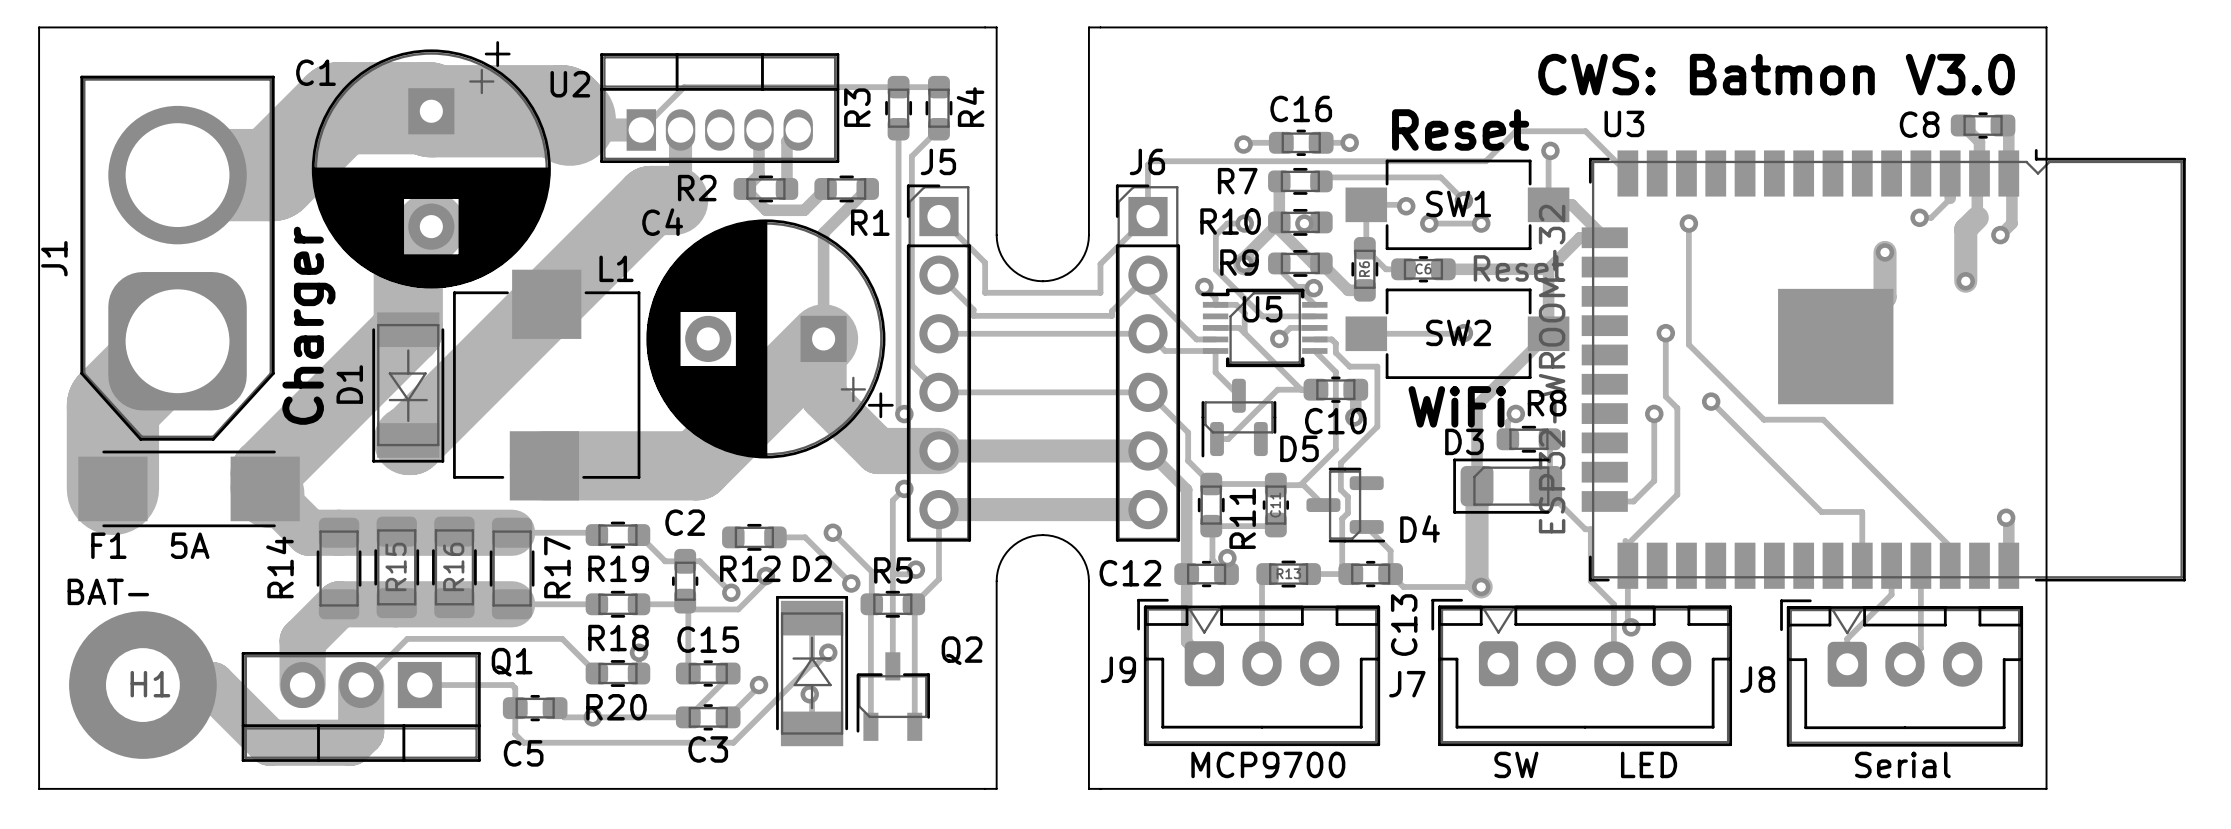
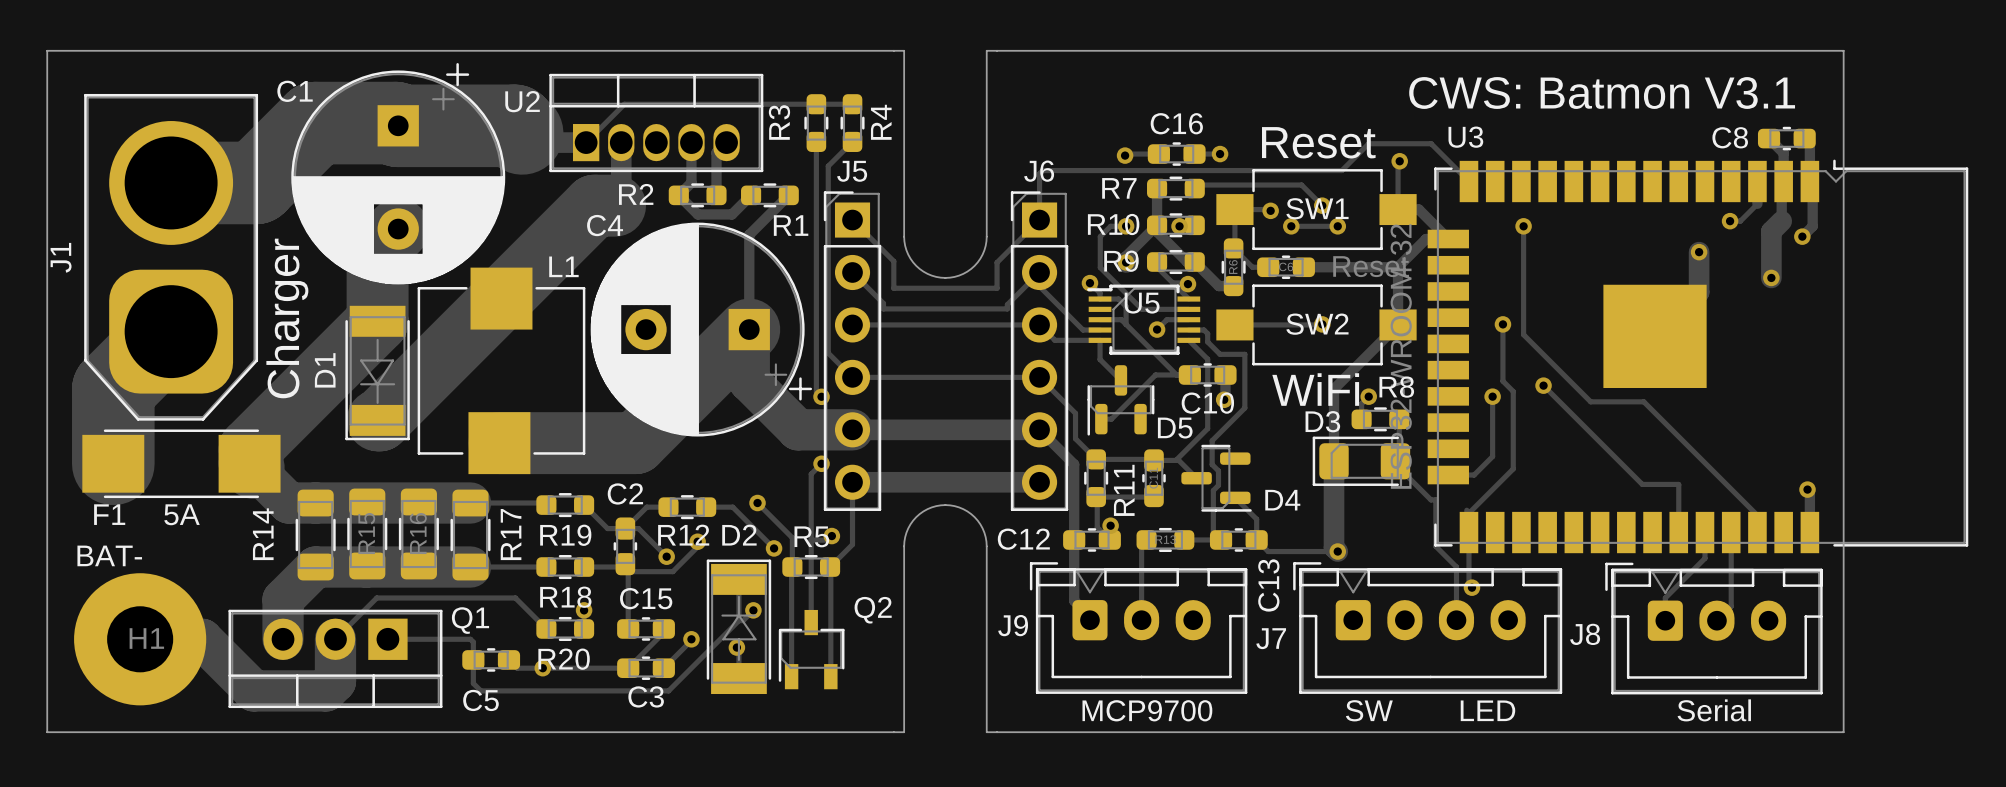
text: CWS: Batmon V3.0 (1776, 74) -> CWS: Batmon V3.1 (1602, 93)
track: none -> (668, 507) (646, 507) (625, 528)

